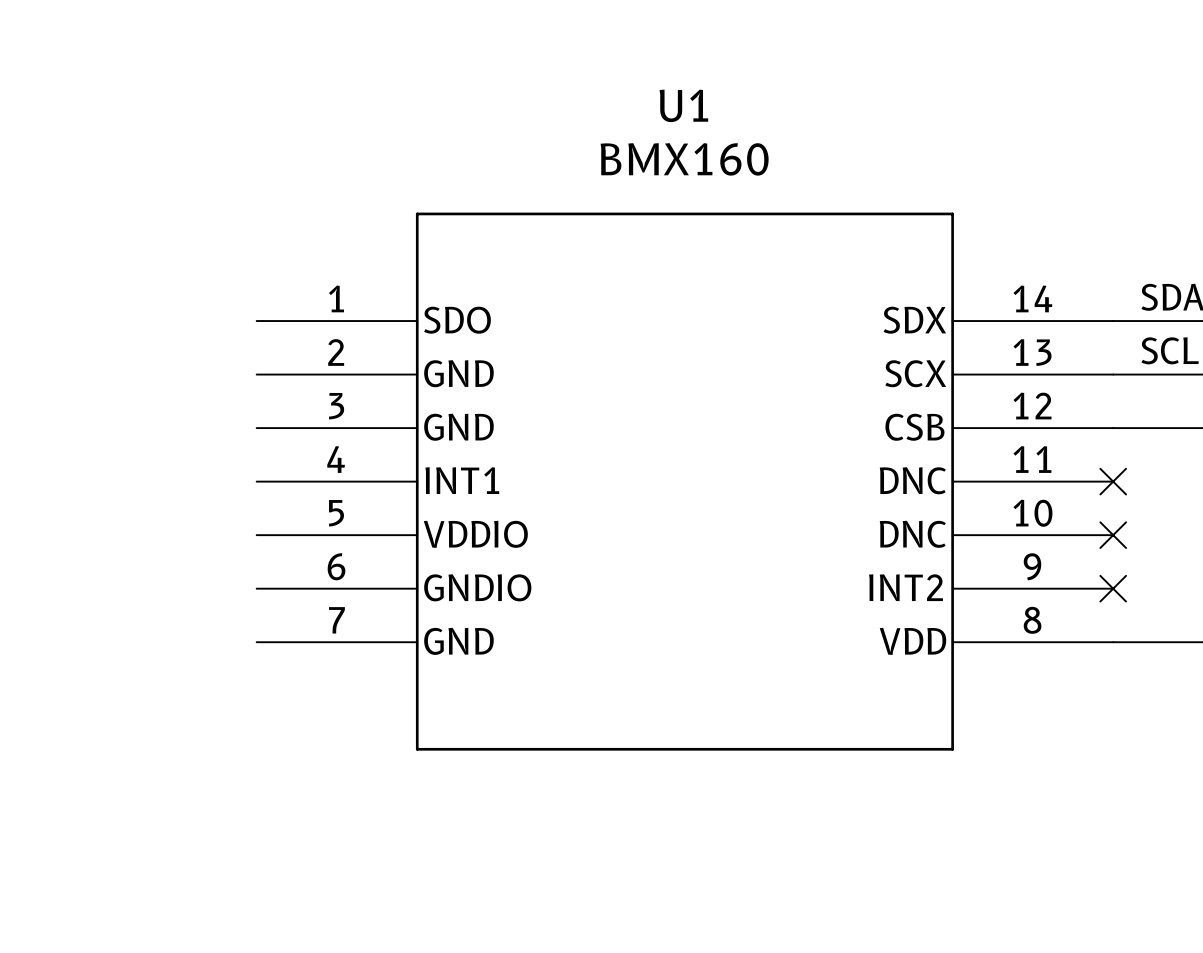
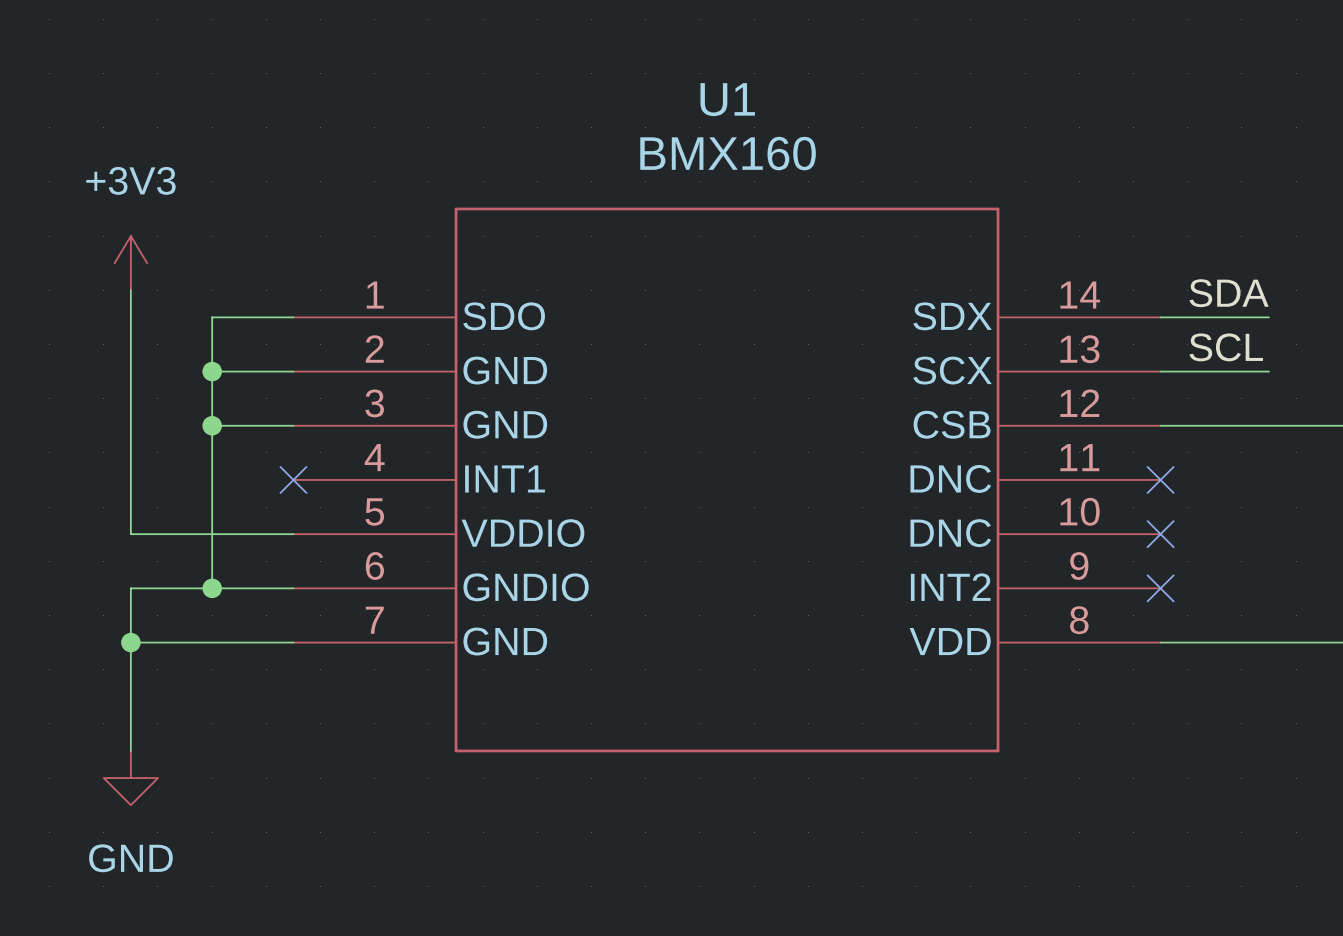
power symbol: none -> +3V3 (130, 263)
wire: none -> (130, 290) (130, 534) (293, 534)
wire: none -> (293, 317) (212, 317) (212, 588)
wire: none -> (212, 371) (293, 371)
junction: none -> (212, 371)
wire: none -> (212, 425) (293, 425)
junction: none -> (212, 425)
no-connect mark: none -> (293, 479)
junction: none -> (212, 588)
wire: none -> (293, 588) (130, 588) (130, 750)
wire: none -> (130, 642) (293, 642)
junction: none -> (130, 642)
power symbol: none -> GND (130, 778)

